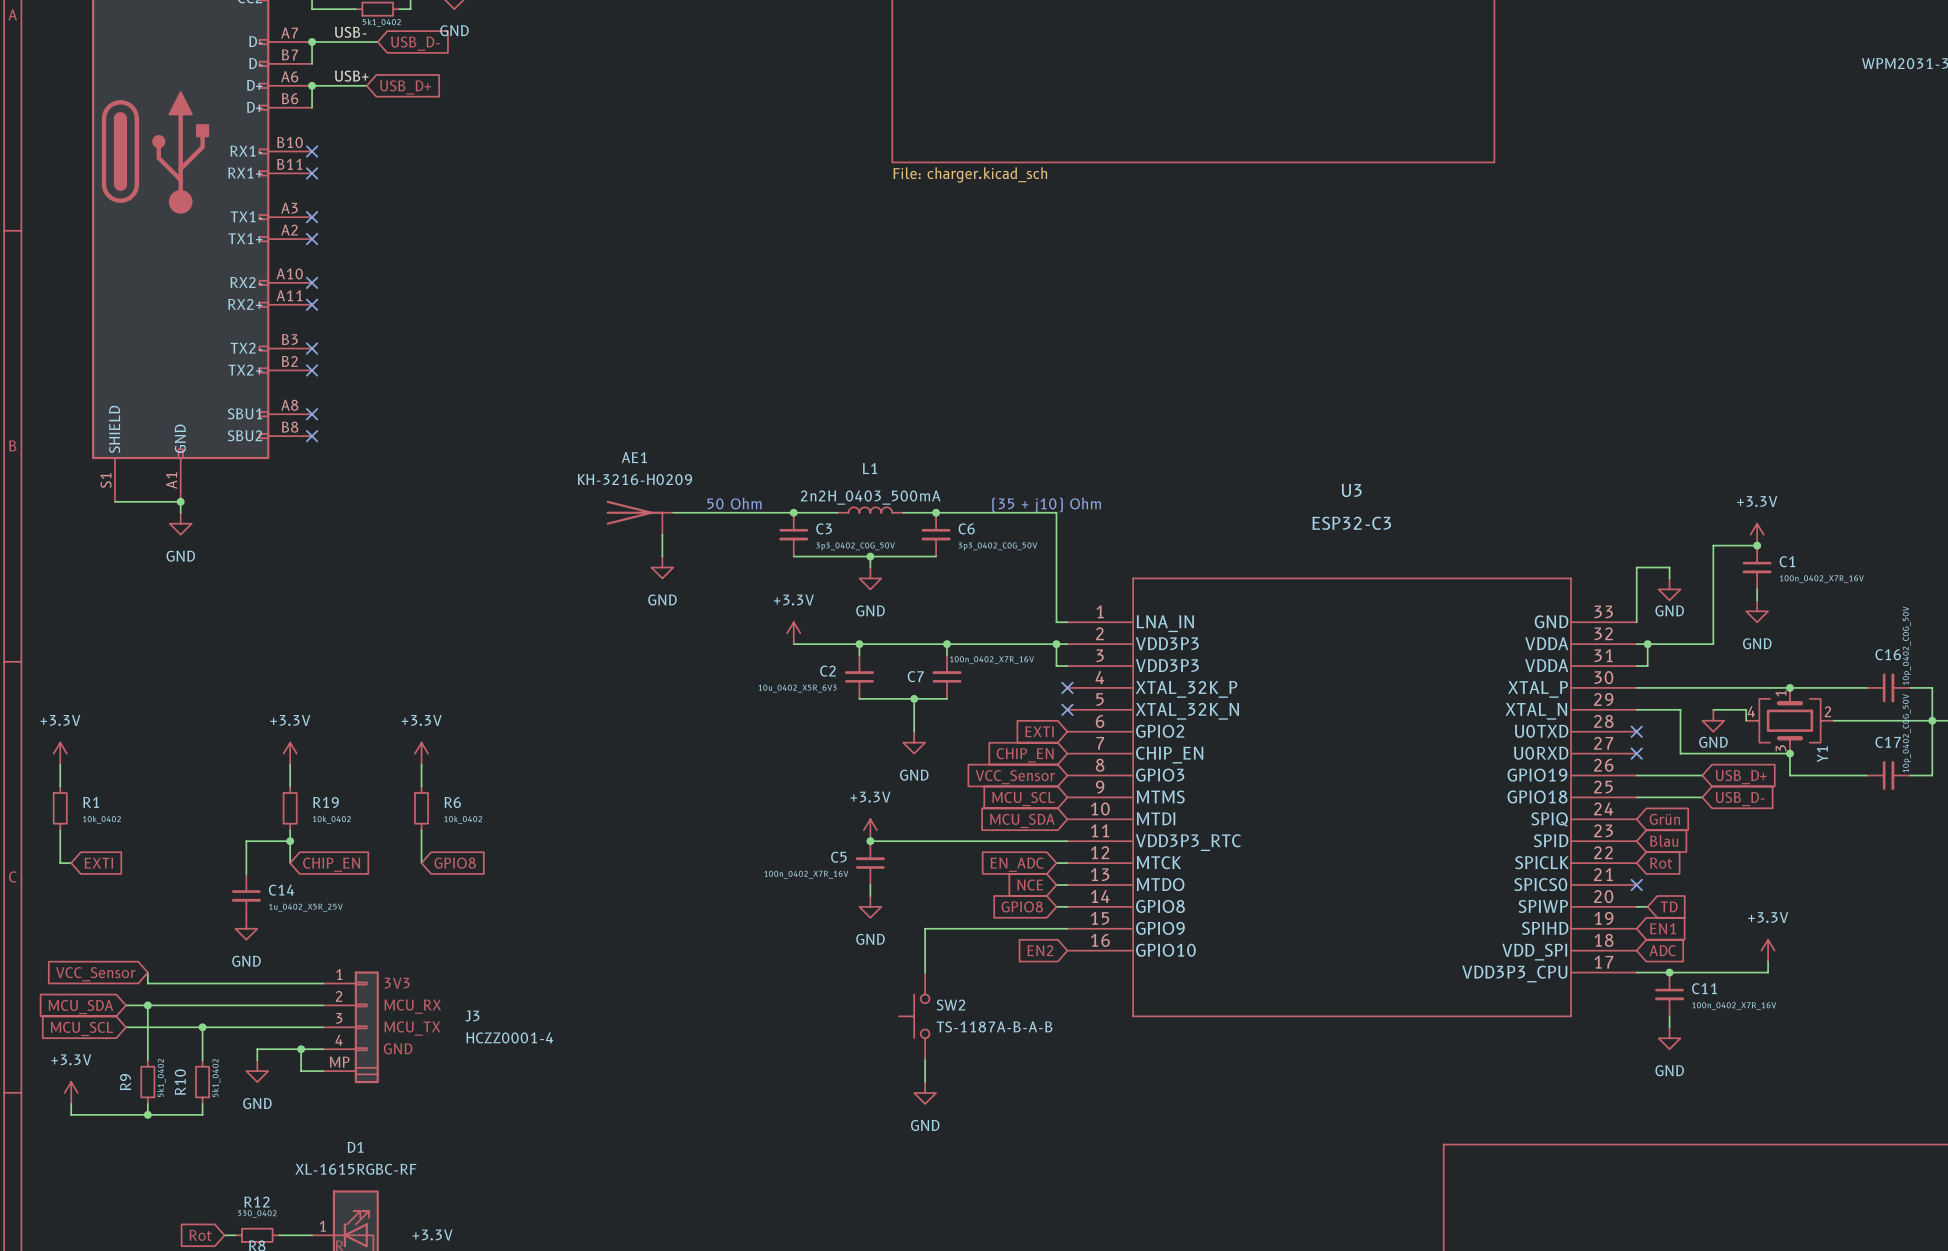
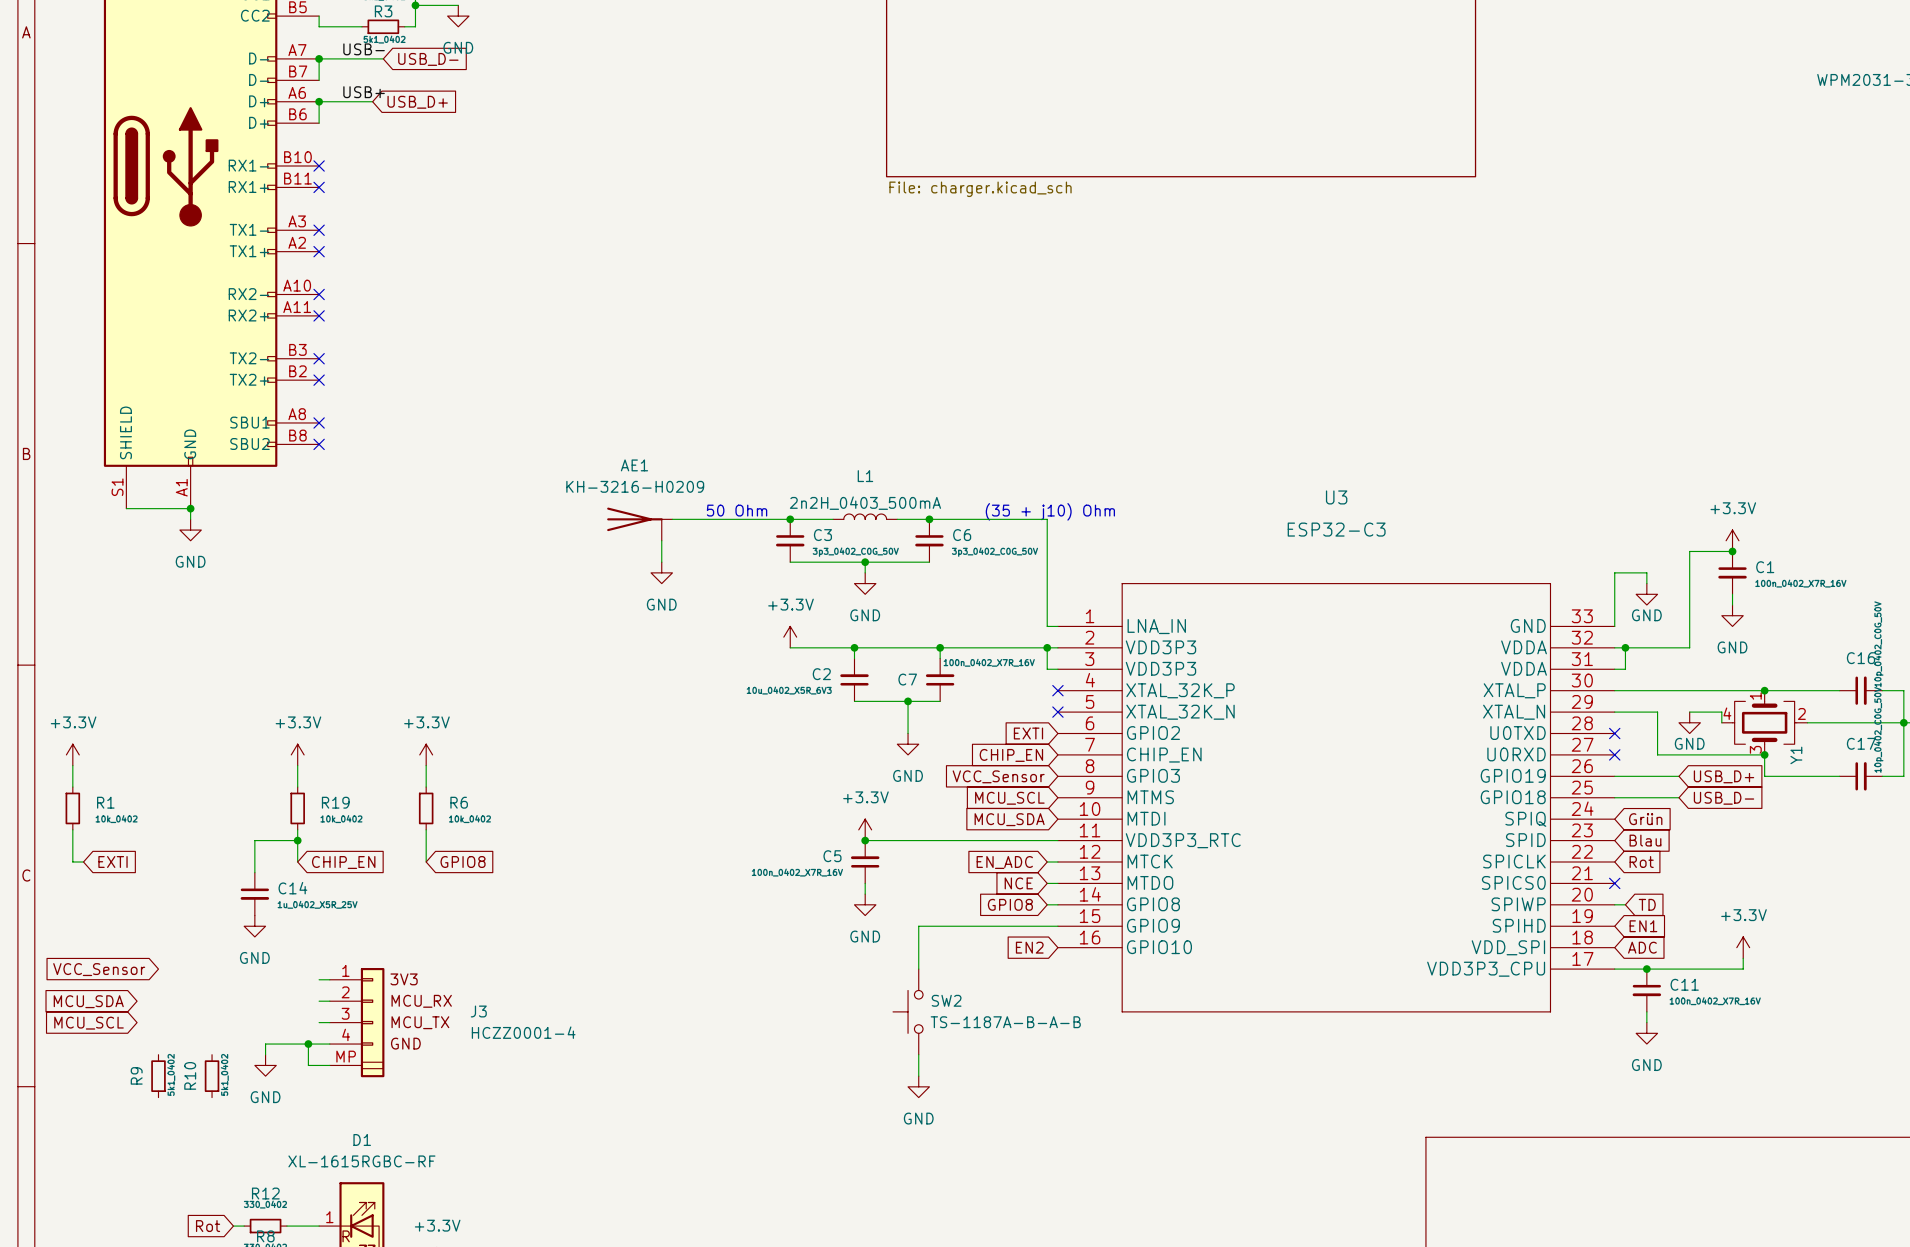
wire: (147, 972) (147, 983) (312, 983) -> none
wire: (125, 1005) (312, 1005) -> none
wire: (147, 1005) (147, 1060) -> none
junction: (147, 1005) -> none
wire: (125, 1027) (312, 1027) -> none
wire: (202, 1027) (202, 1060) -> none
junction: (202, 1027) -> none
power symbol: +3.3V (71, 1092) -> none
wire: (71, 1103) (71, 1114) (202, 1114) (202, 1103) -> none
wire: (147, 1103) (147, 1114) -> none
junction: (147, 1114) -> none

